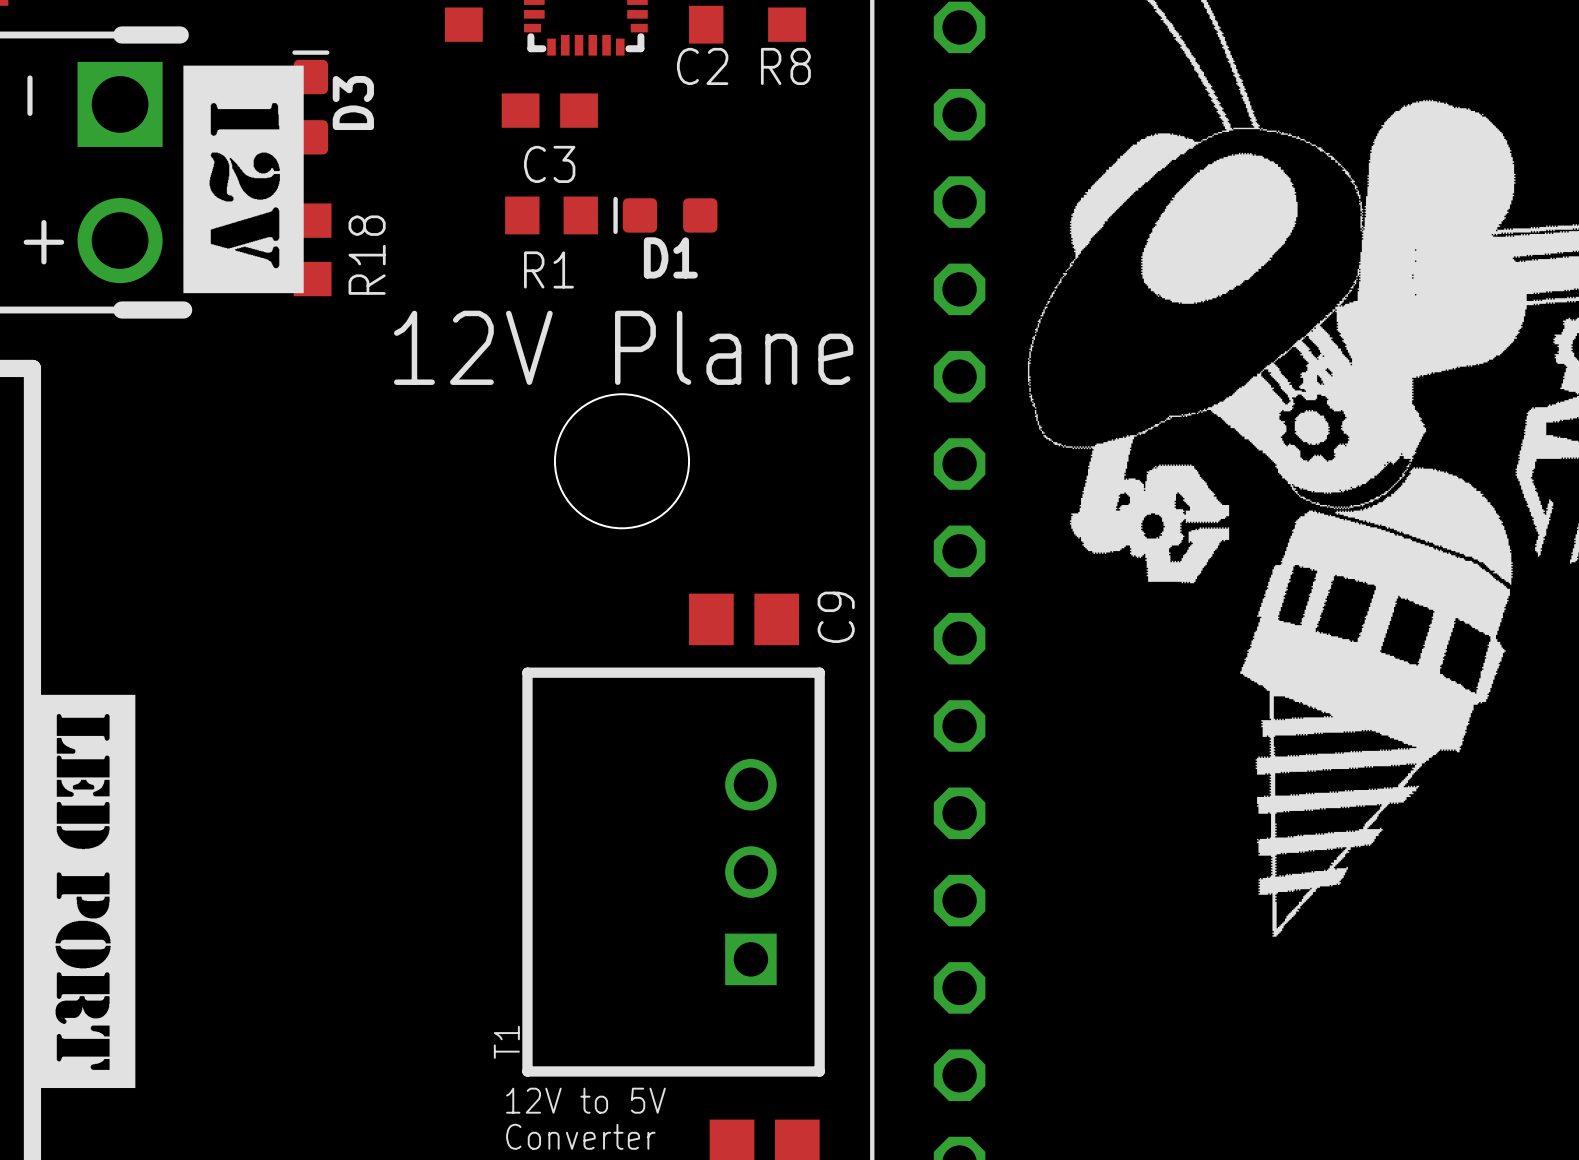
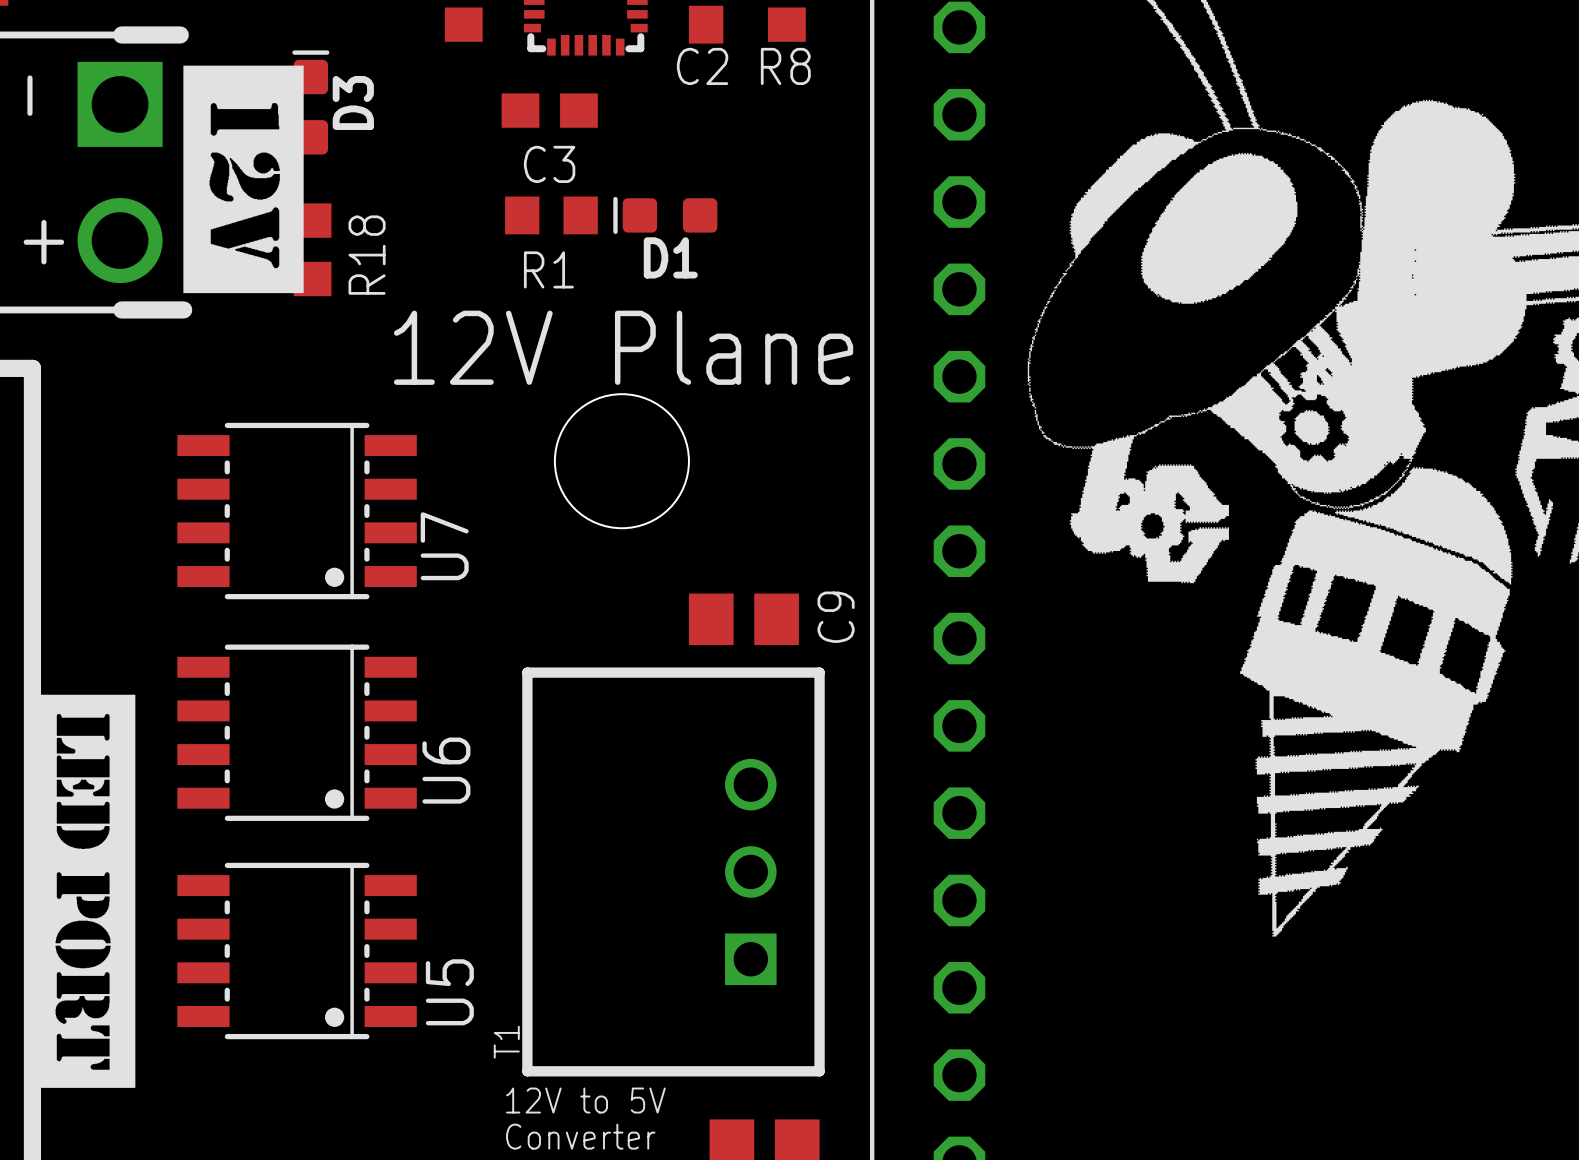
U7: none -> (297, 511)
U6: none -> (297, 732)
U5: none -> (297, 951)

